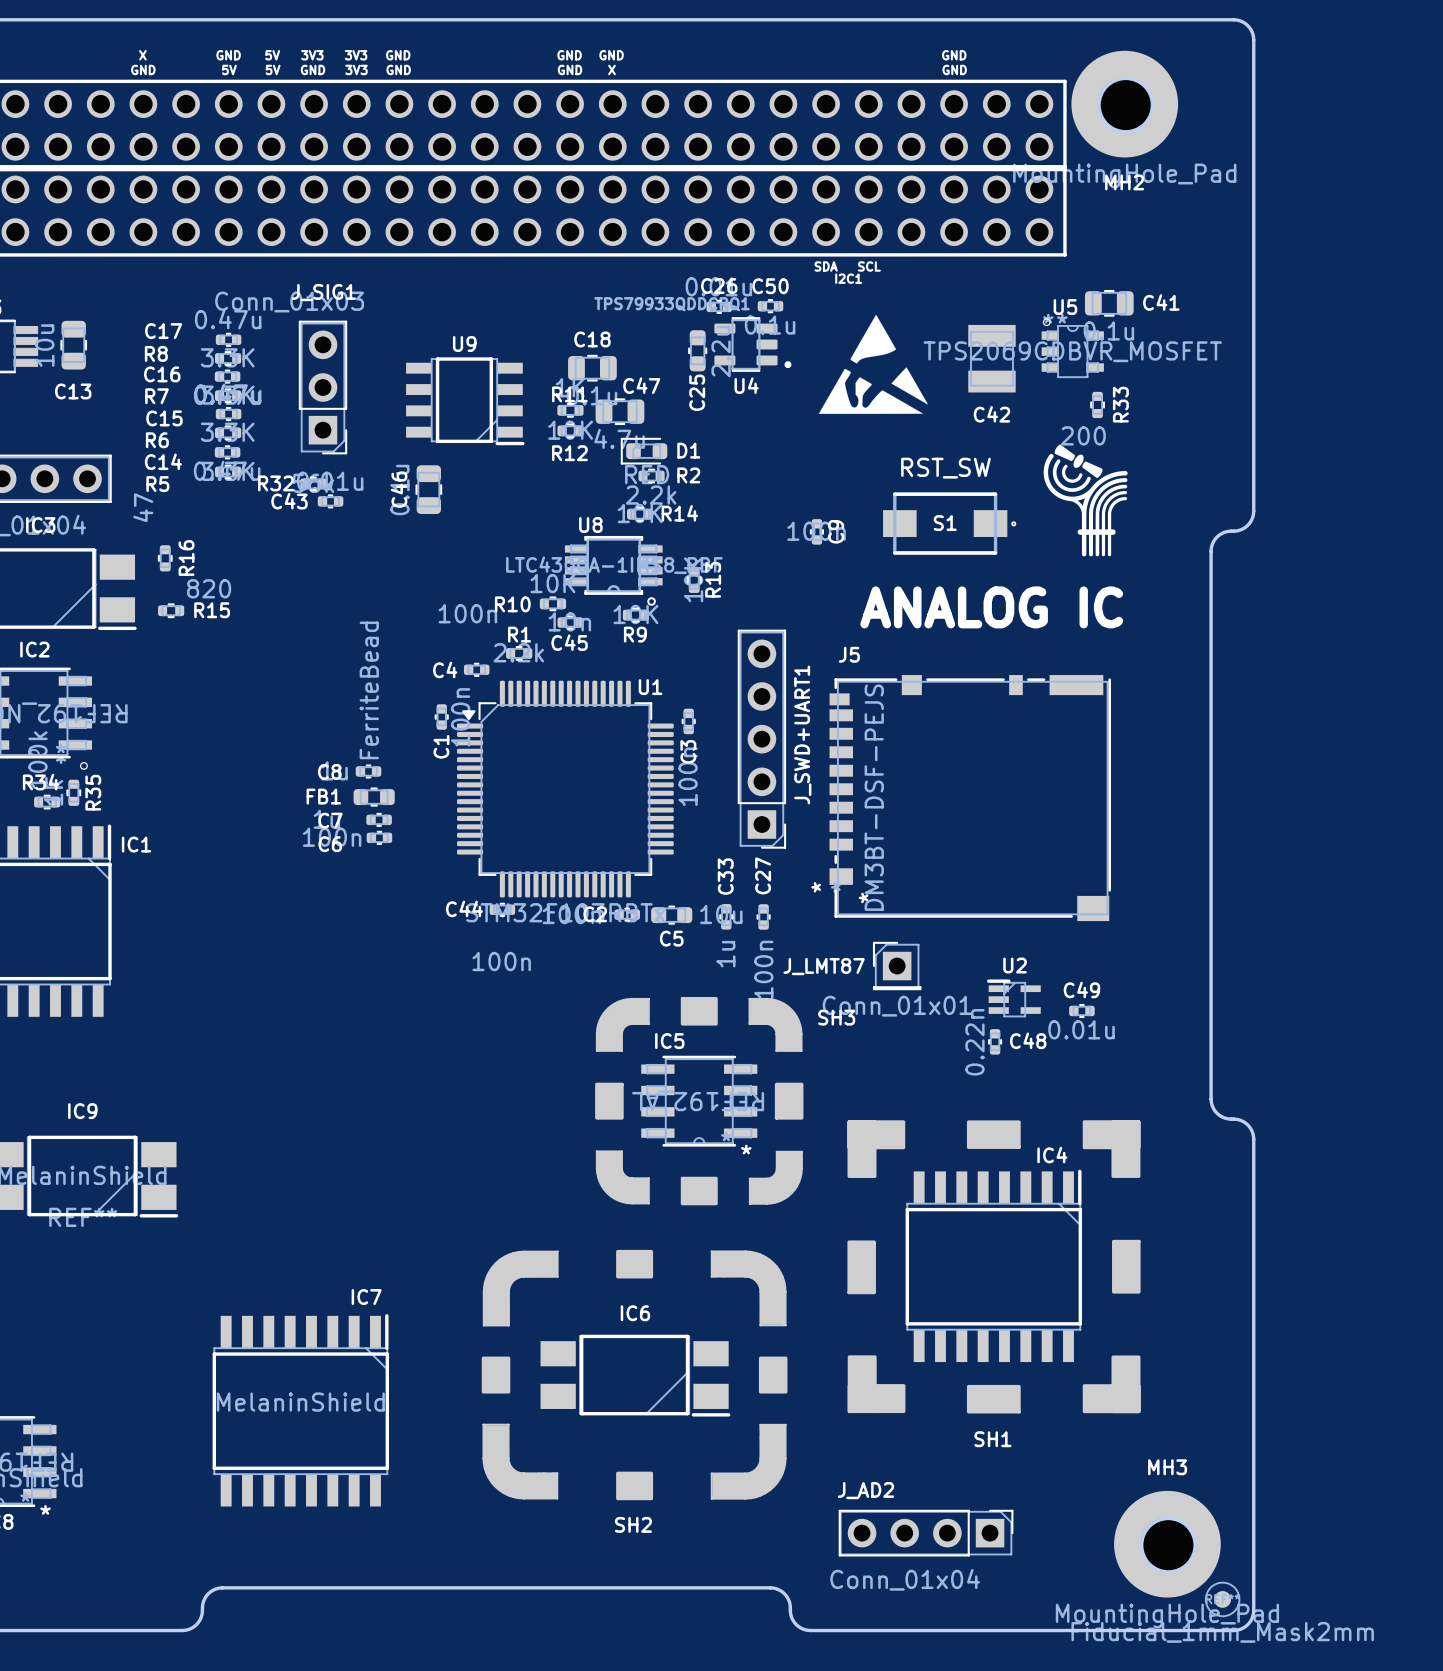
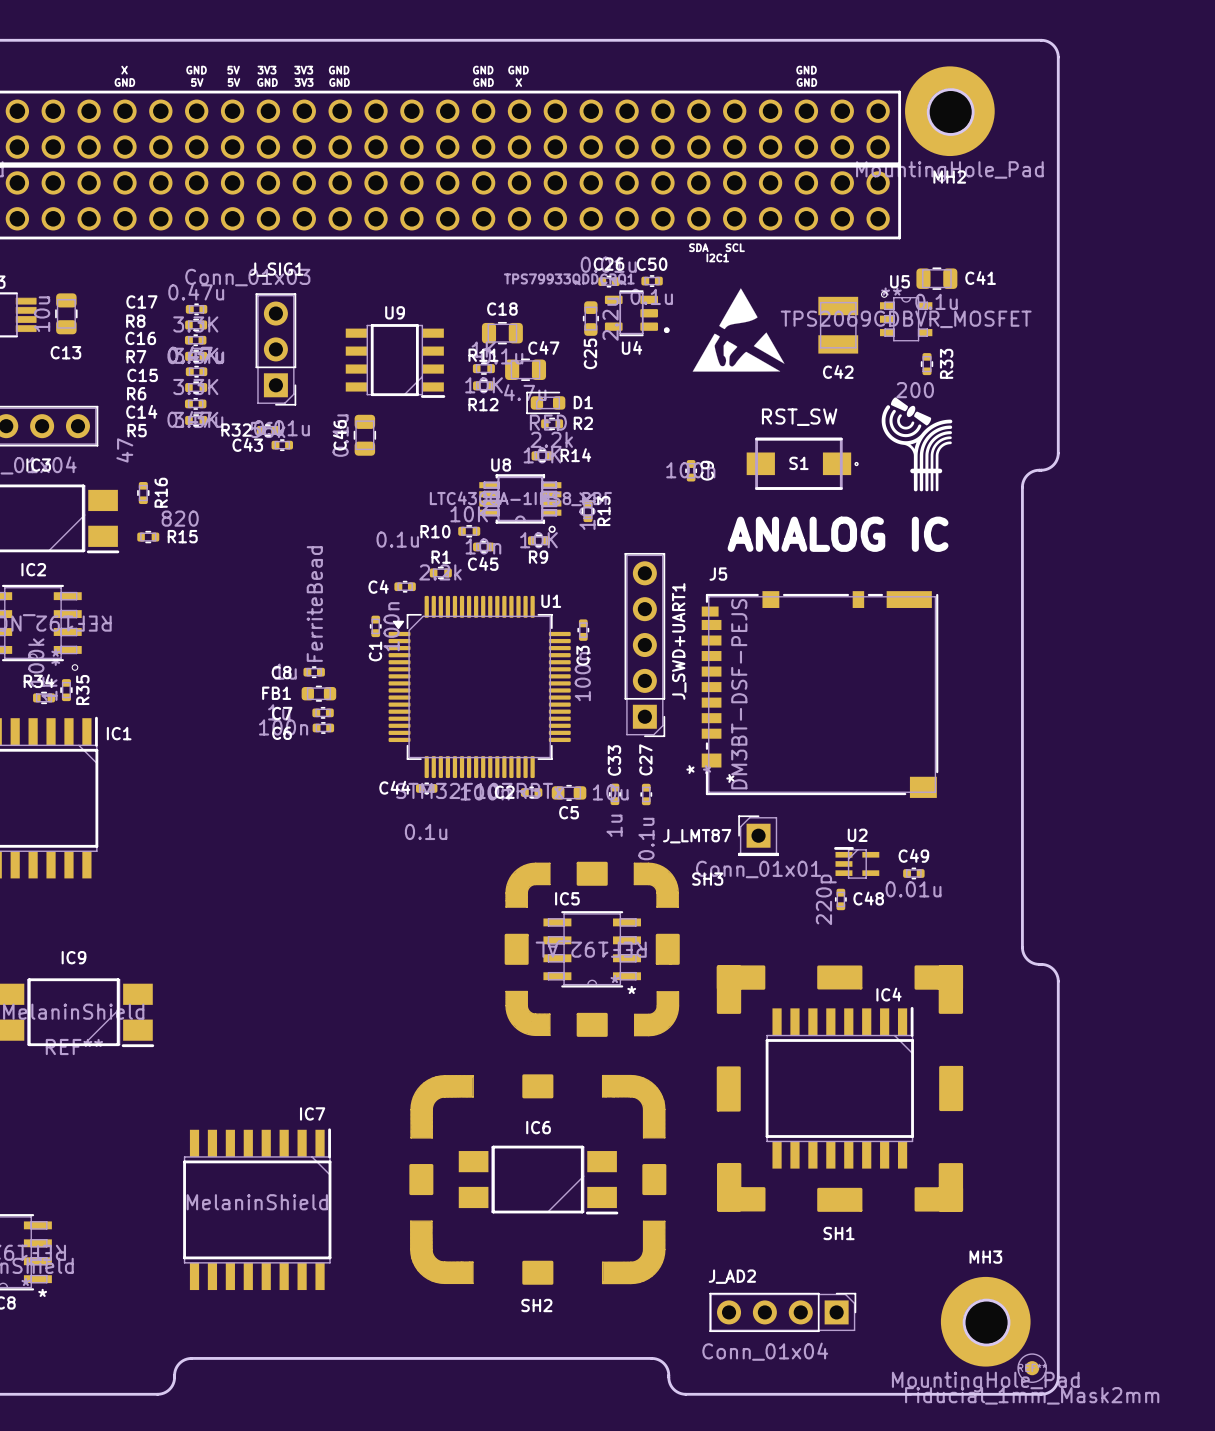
C4 value: 100n (467, 613) -> 0.1u (397, 539)
C44 value: 100n (501, 961) -> 0.1u (426, 831)
C27 value: 100n (763, 969) -> 0.1u (646, 839)
C48 value: 0.22n (974, 1042) -> 220p (826, 899)

